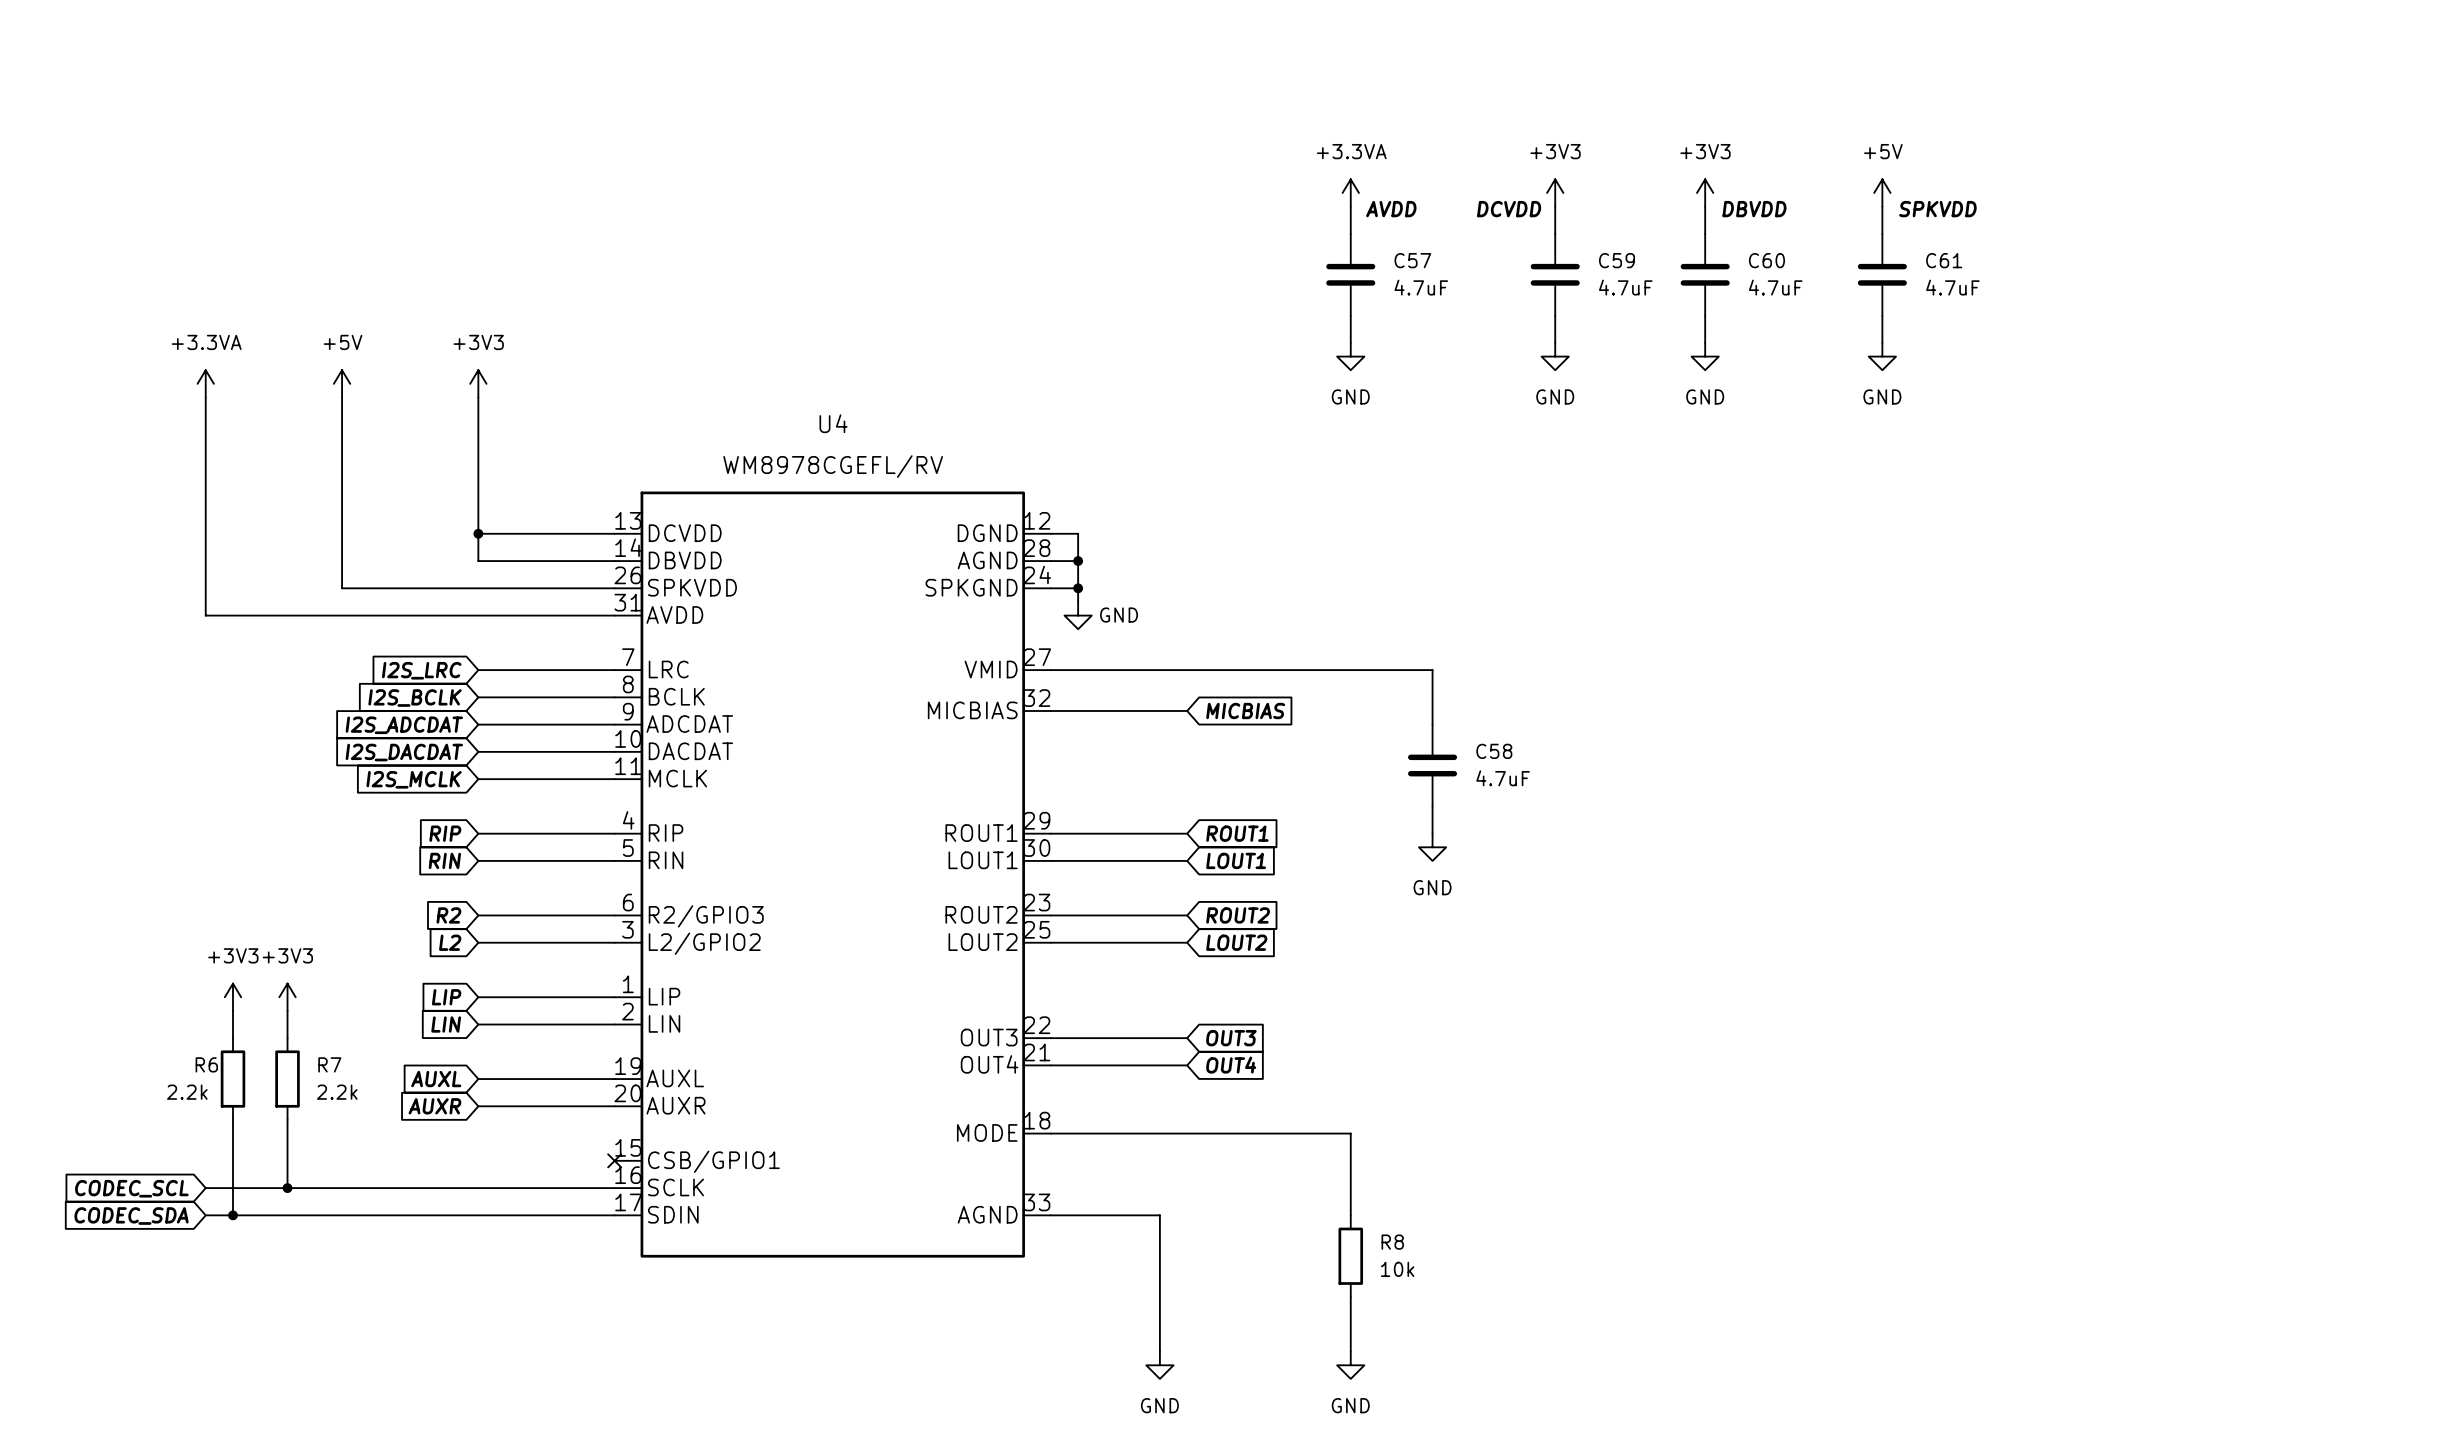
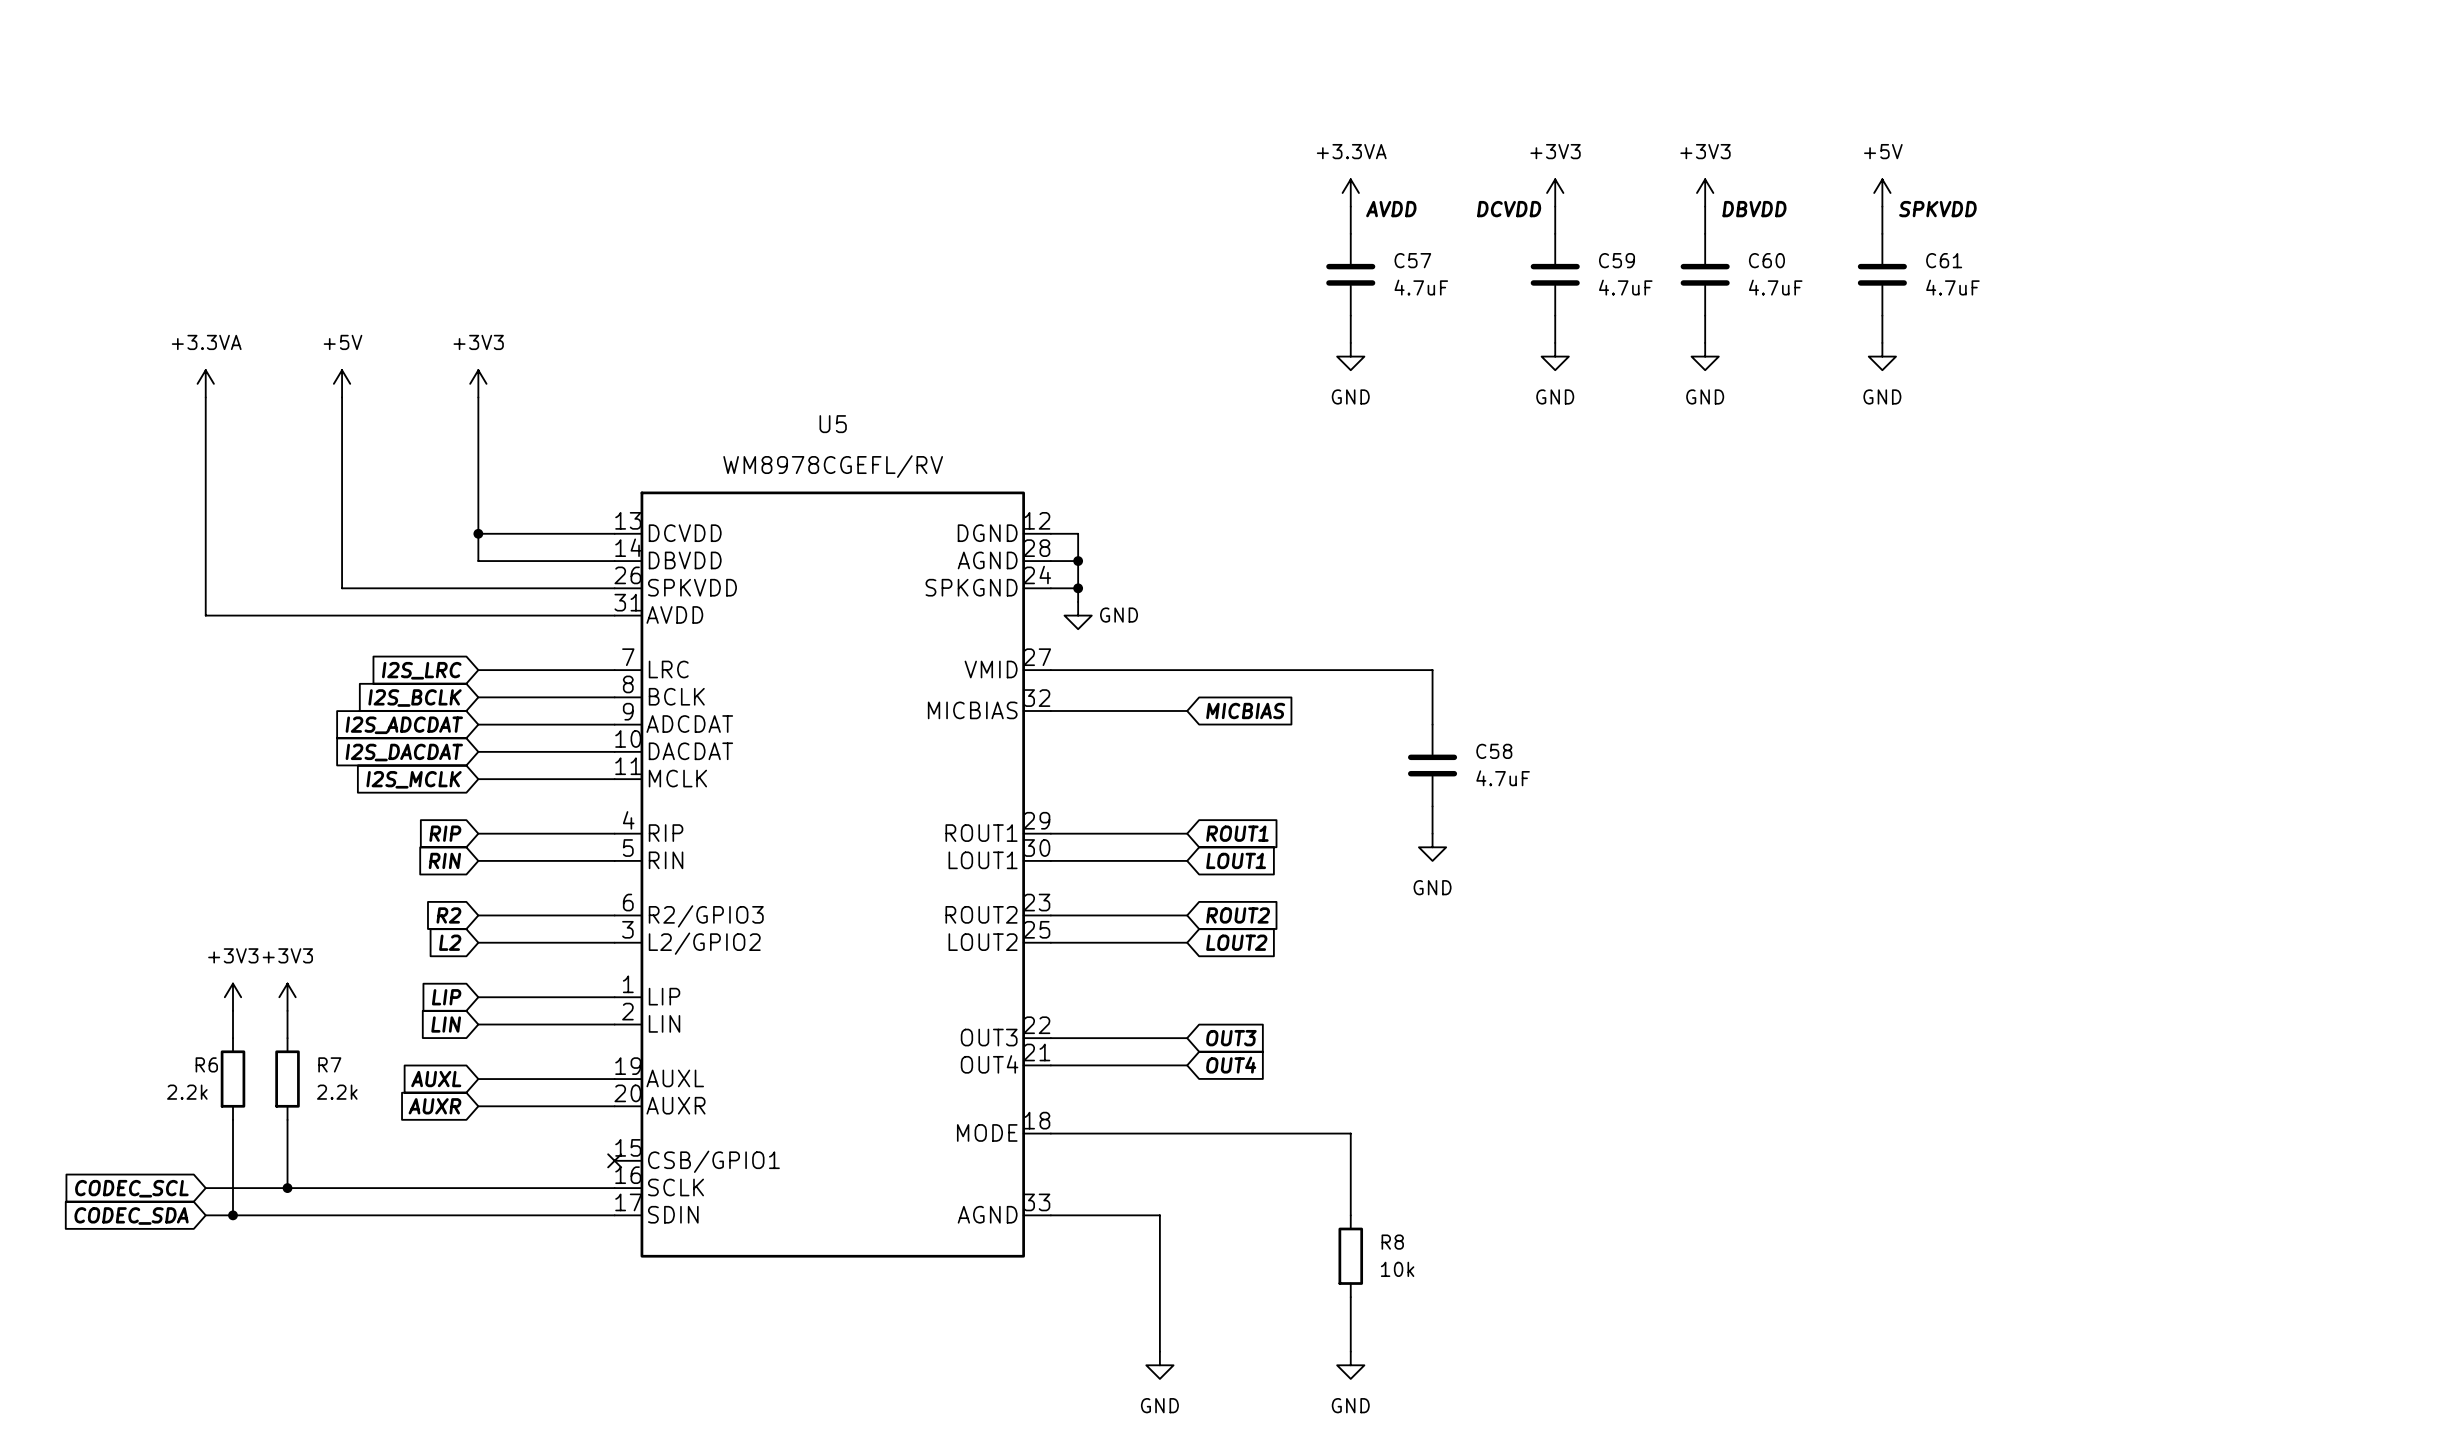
U4 name: U4 (833, 423) -> U5 (833, 424)

